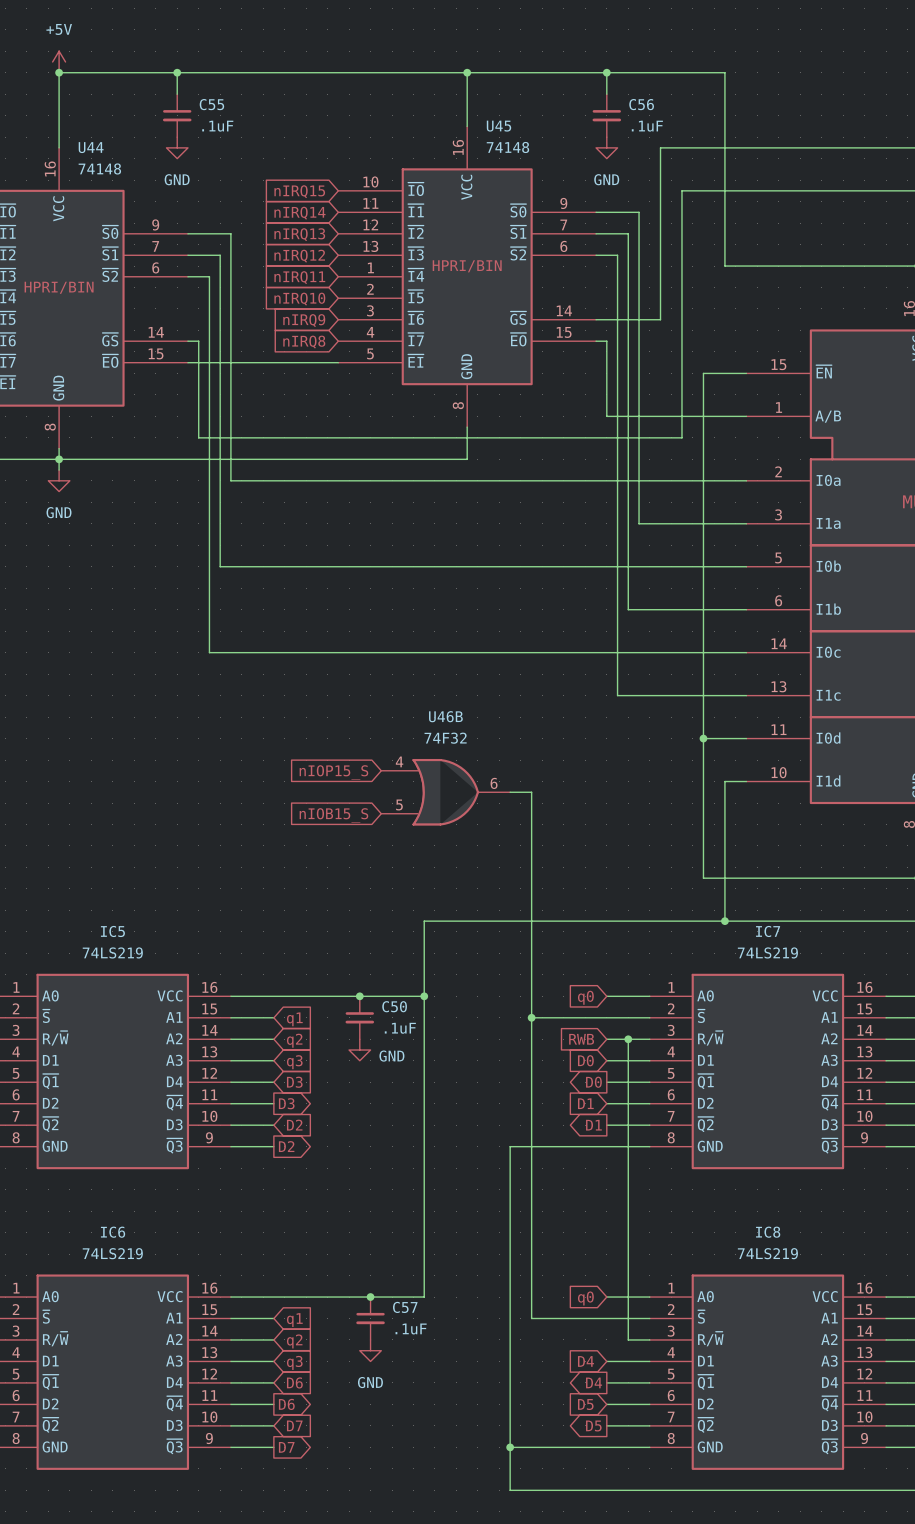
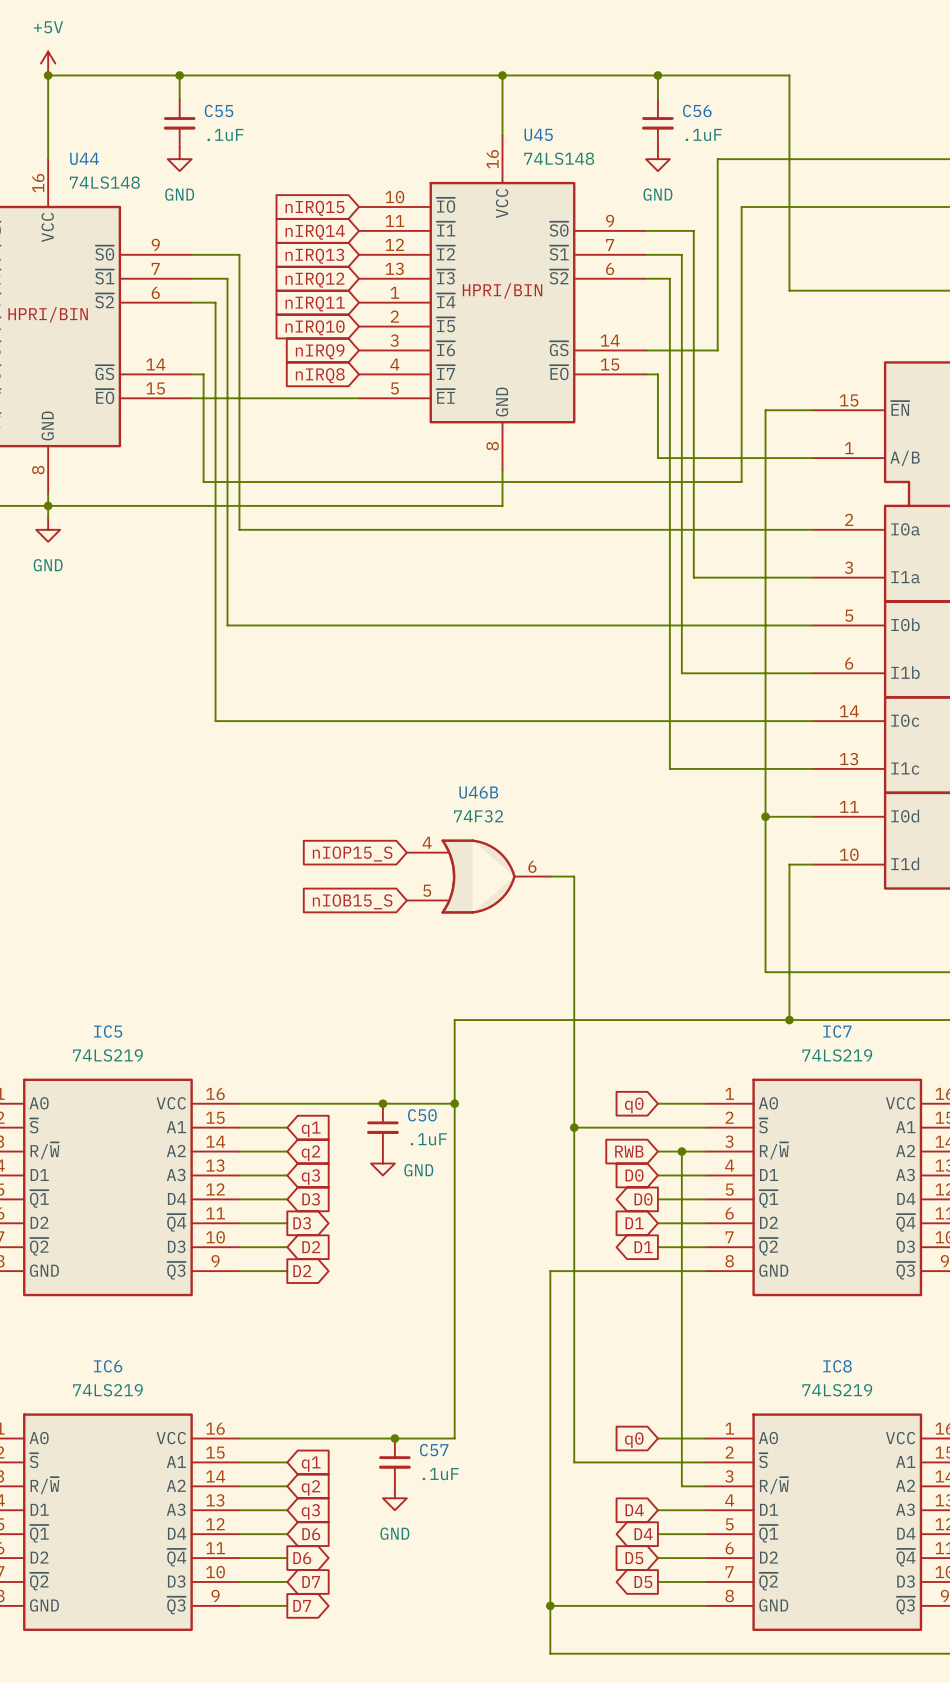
U45 value: 74148 (507, 147) -> 74LS148 (559, 158)
U44 value: 74148 (99, 168) -> 74LS148 (104, 182)

